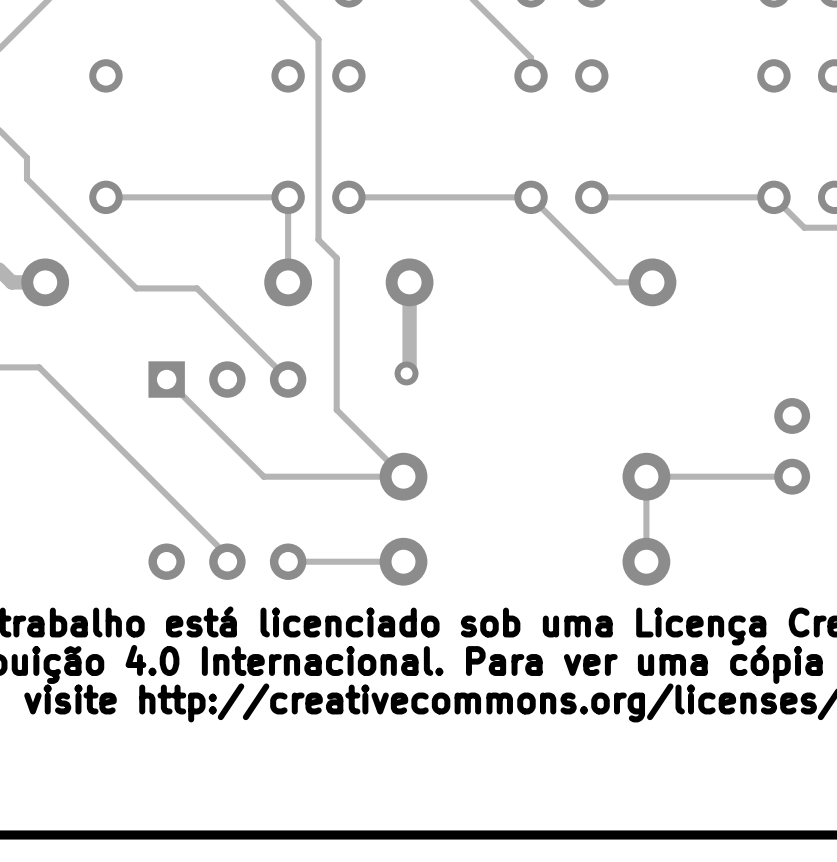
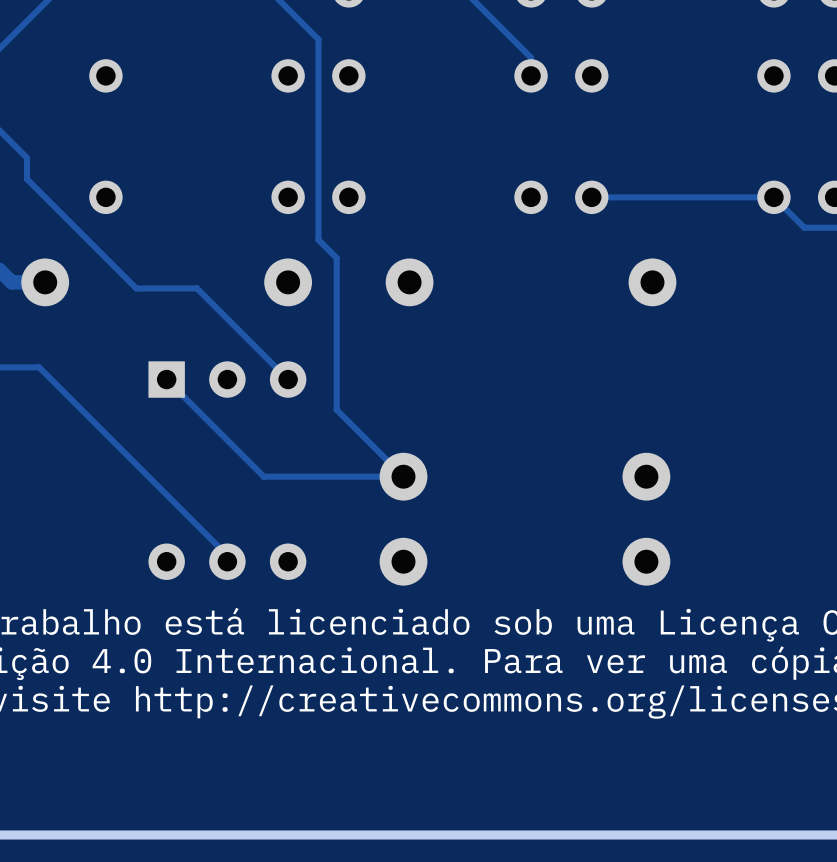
track: (105, 197) (288, 197) (288, 282) -> none
track: (348, 197) (531, 197) (616, 282) (652, 282) -> none
track: (409, 282) (409, 370) (406, 373) -> none
via: (406, 373) -> none
part: (792, 446) -> none
track: (792, 476) (646, 476) (646, 561) -> none
track: (403, 561) (288, 561) -> none

